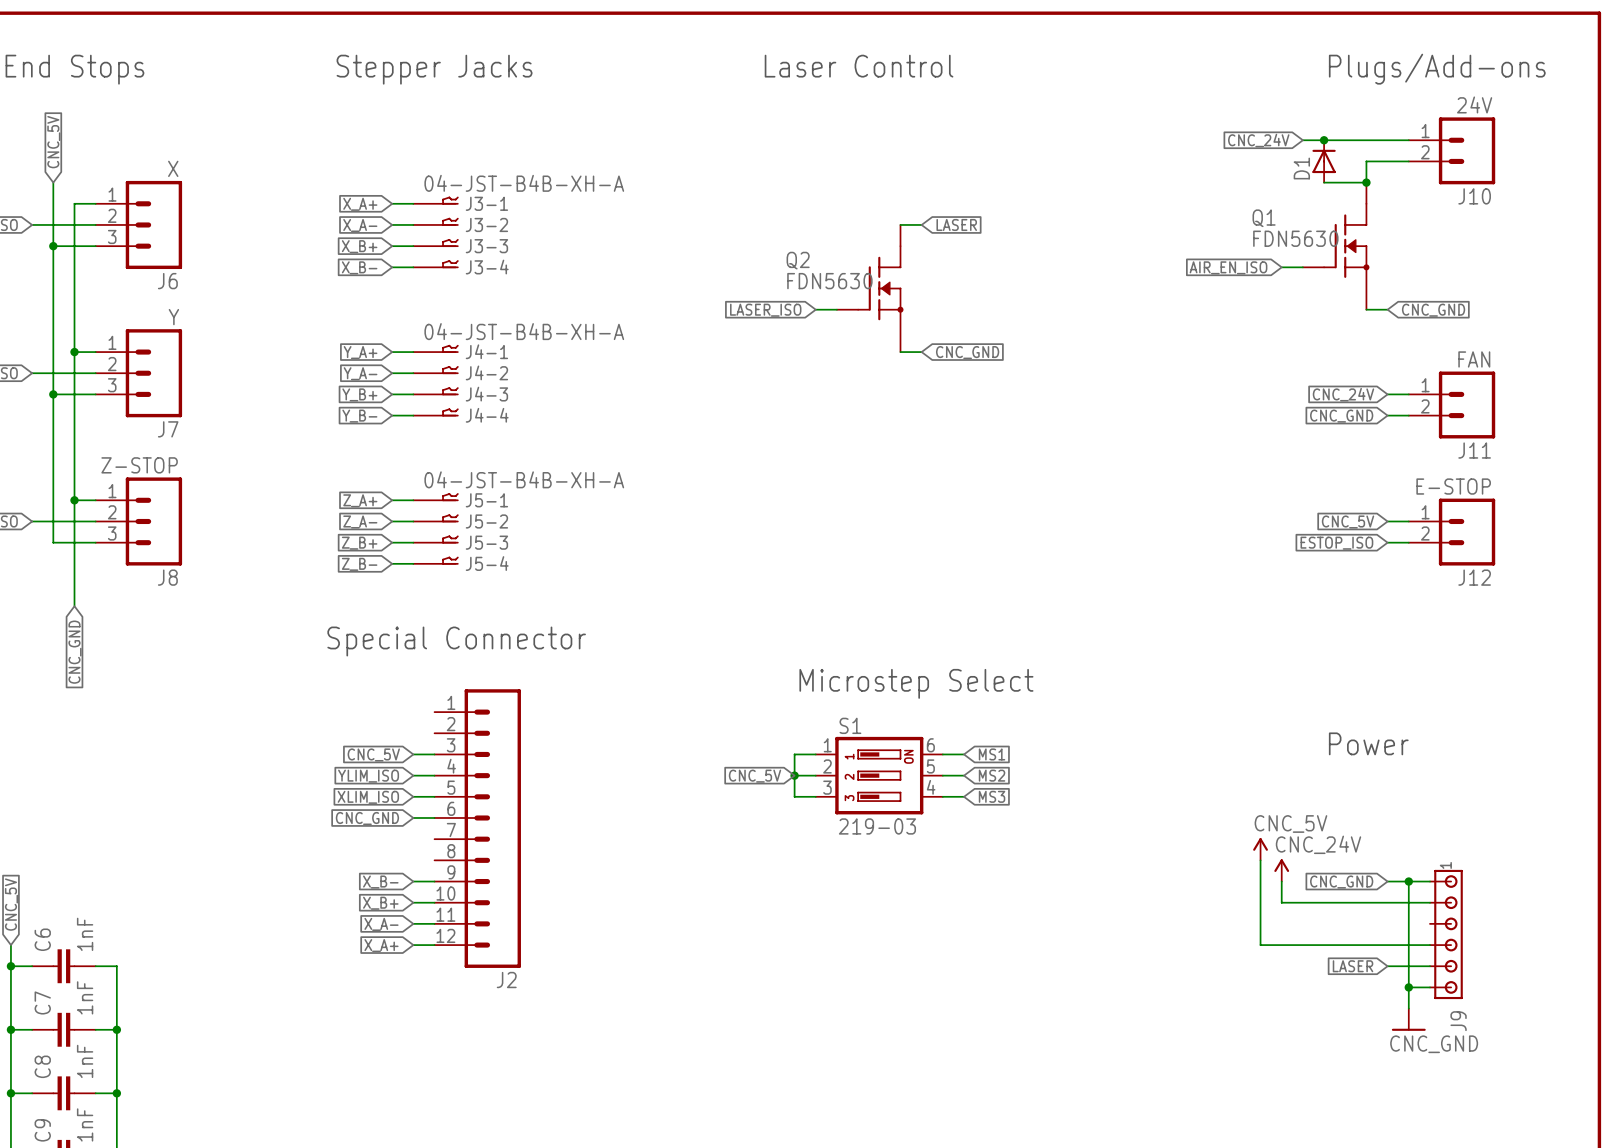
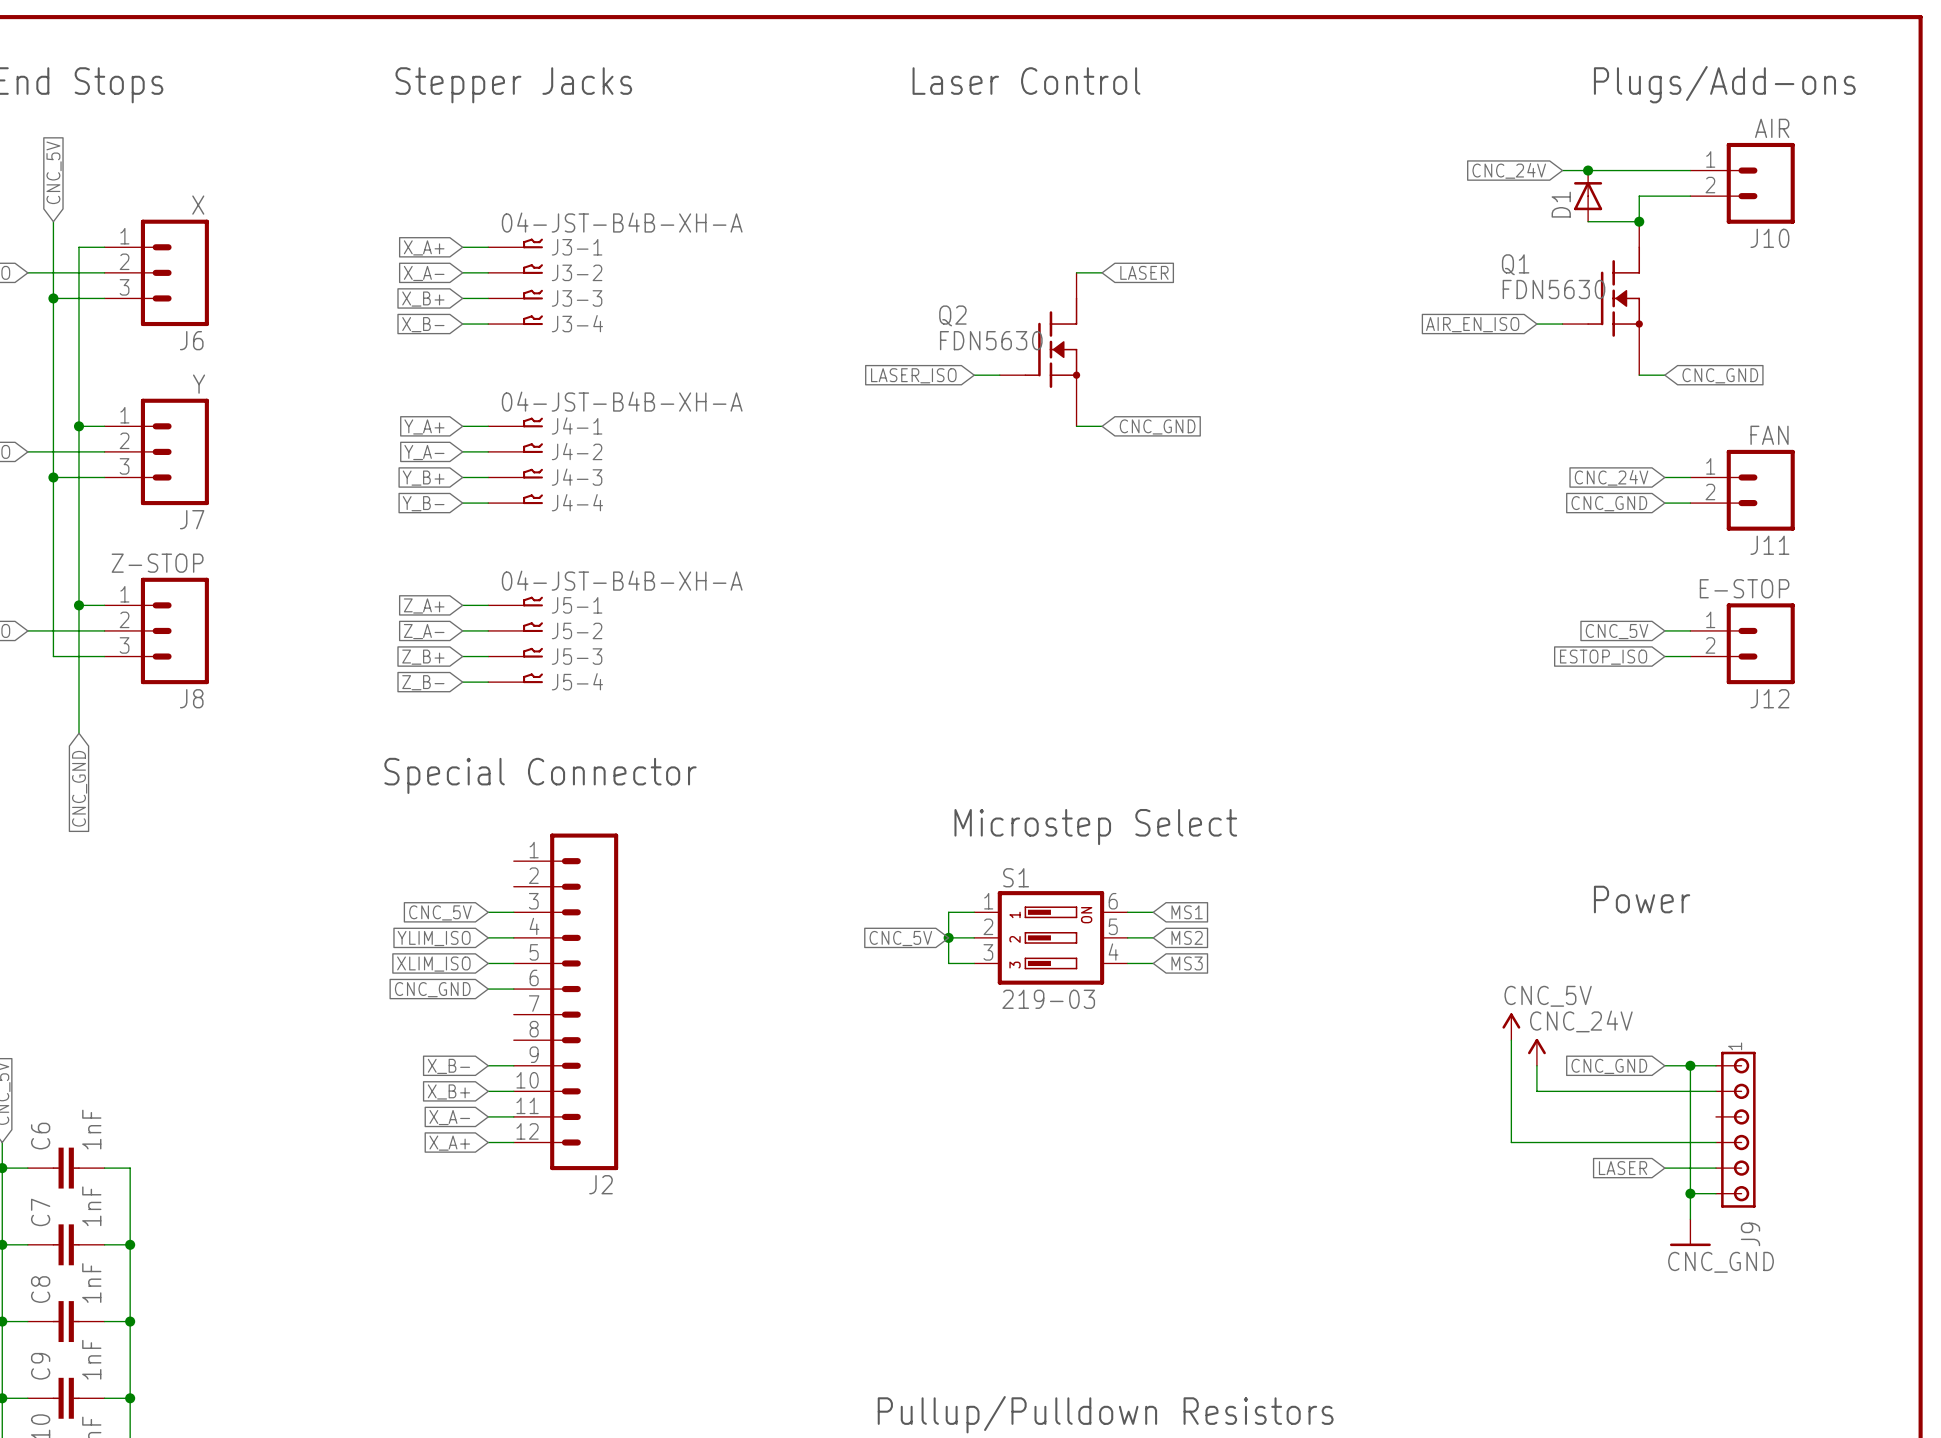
J10 value: 24V (1474, 104) -> AIR (1772, 128)

